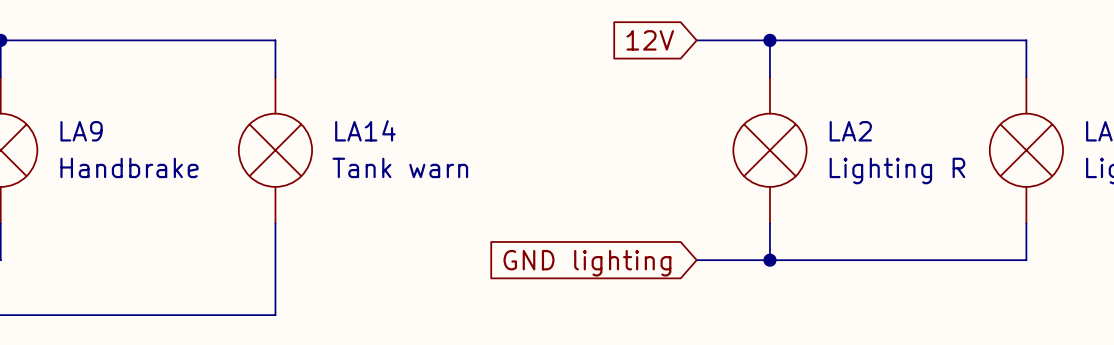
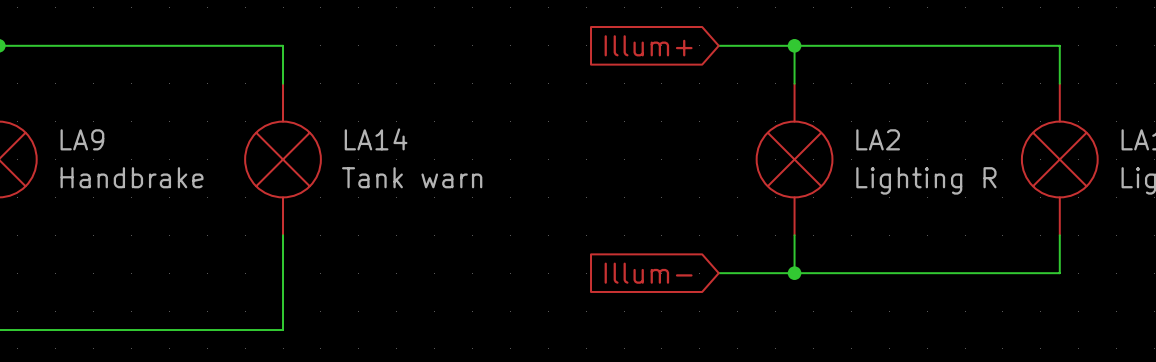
global label: 12V (650, 40) -> Illum+ (648, 45)
global label: GND lighting (587, 263) -> Illum- (648, 273)

